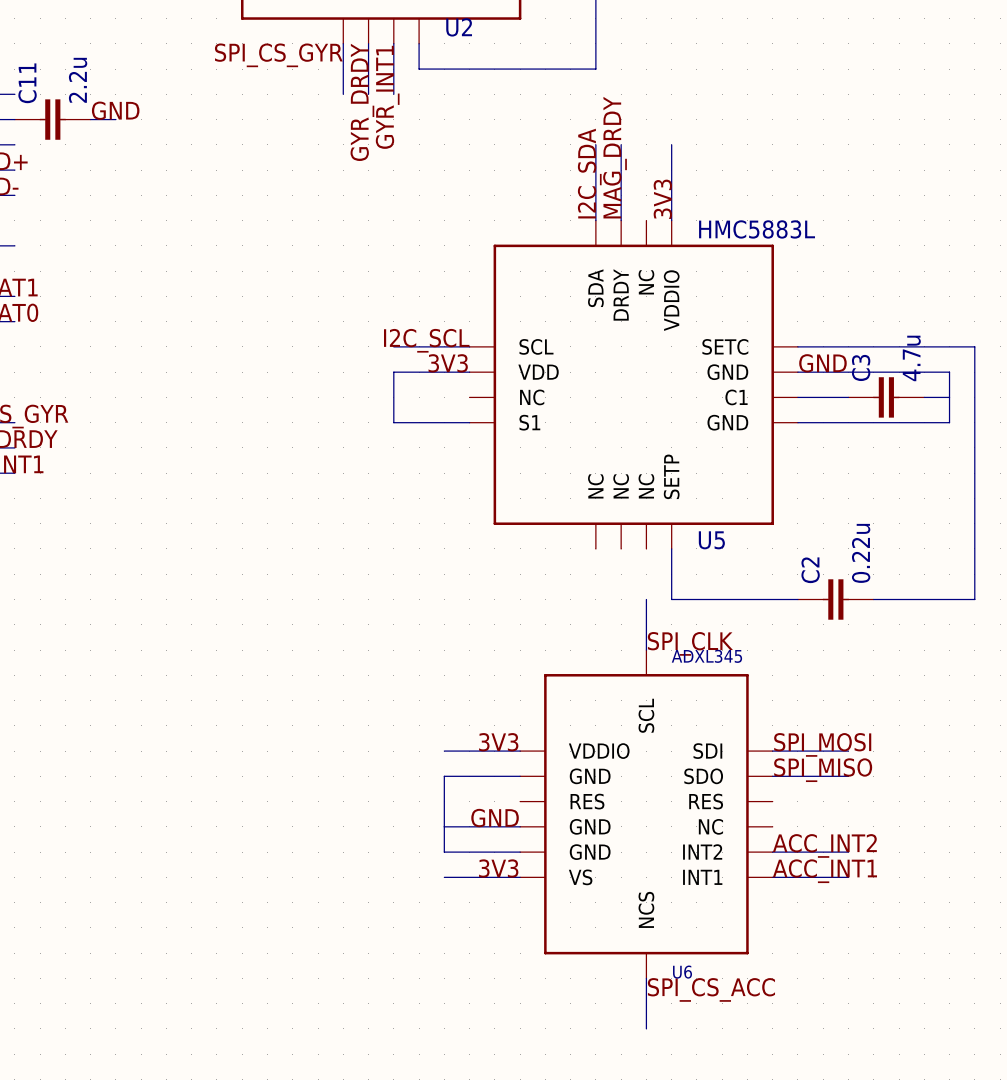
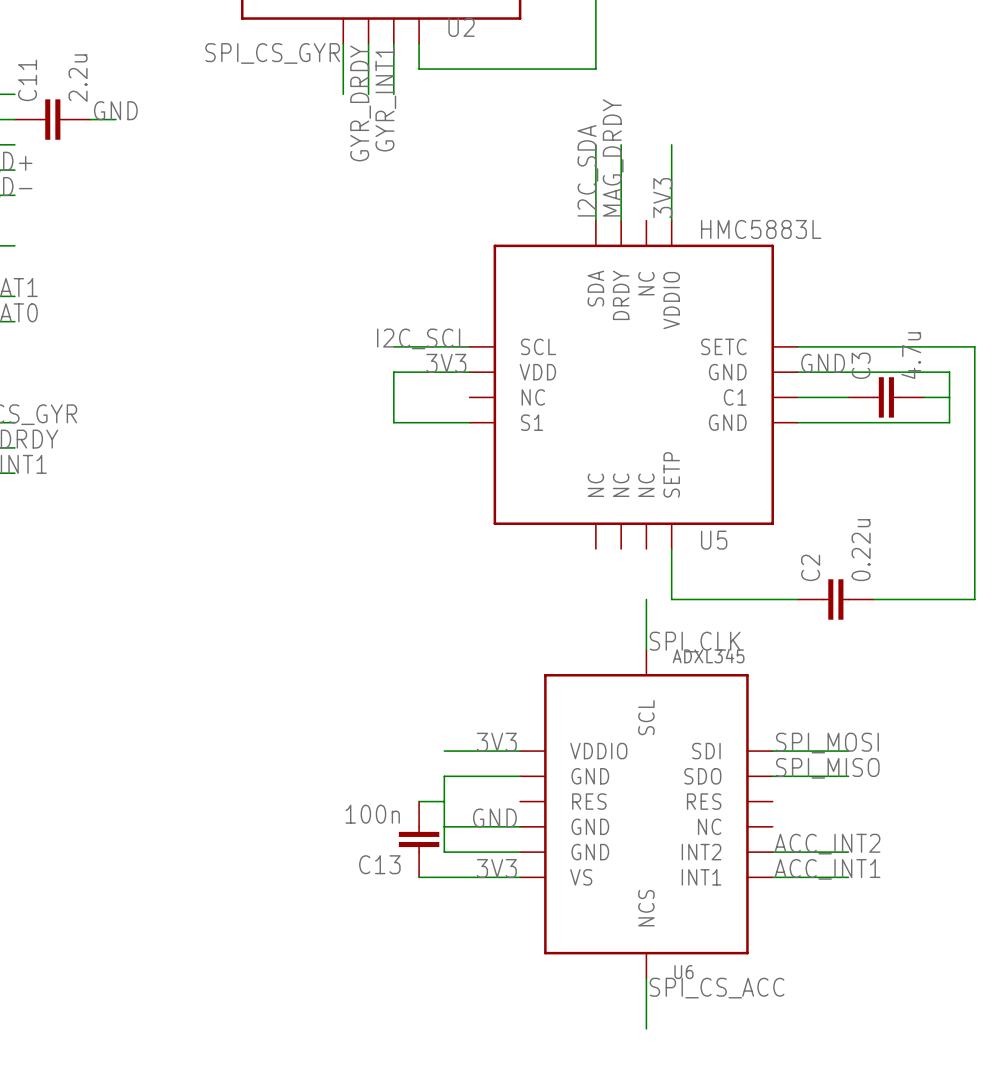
wire: none -> (419, 801) (444, 801)
C13: none -> 100n (419, 839)
wire: none -> (419, 877) (444, 877)

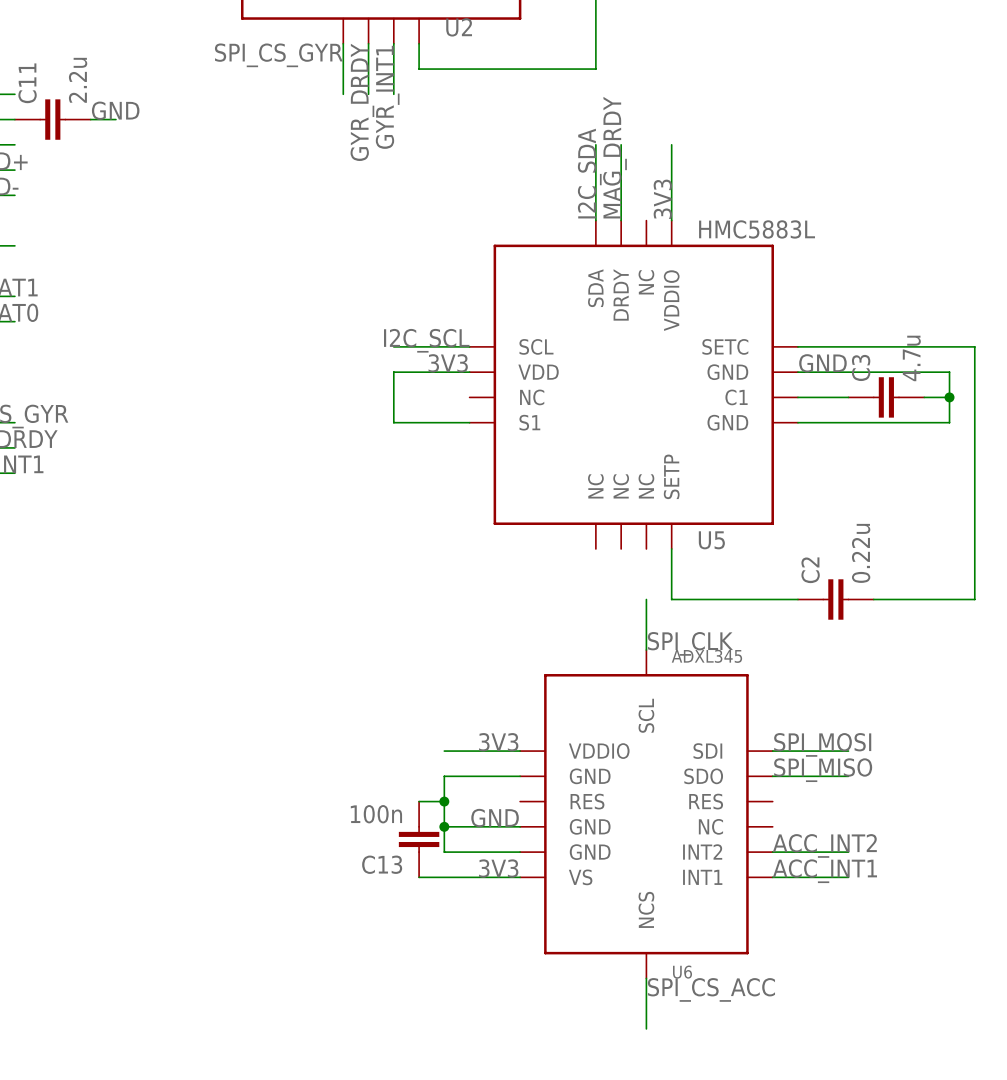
junction: none -> (949, 397)
junction: none -> (444, 801)
junction: none -> (444, 826)

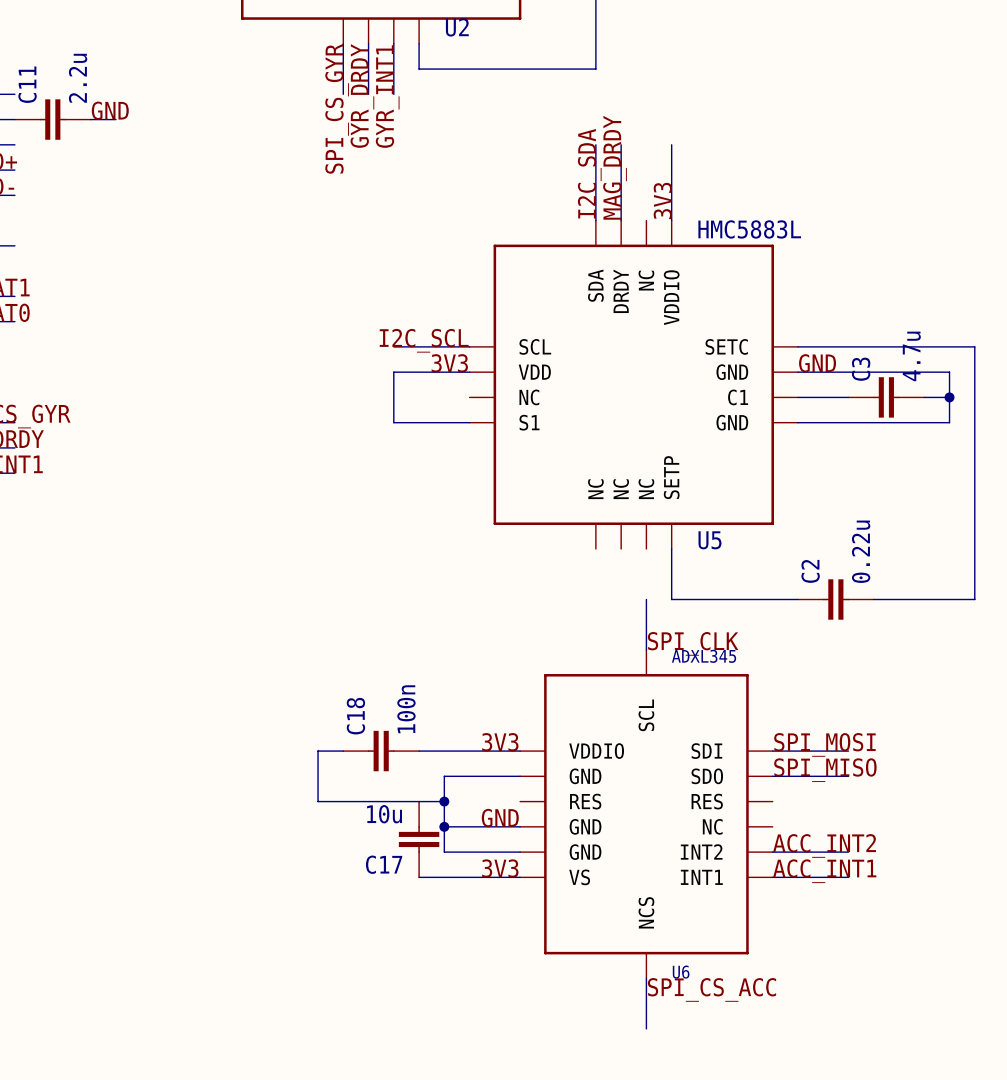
label rotation: 0° (278, 55) -> 90° counterclockwise (337, 108)
wire: none -> (343, 751) (318, 751) (318, 801) (419, 801)
C18: none -> 100n (381, 751)
wire: none -> (419, 751) (444, 751)
C13 value: 100n (376, 814) -> 10u (384, 814)
C13 name: C13 (382, 864) -> C17 (384, 864)

